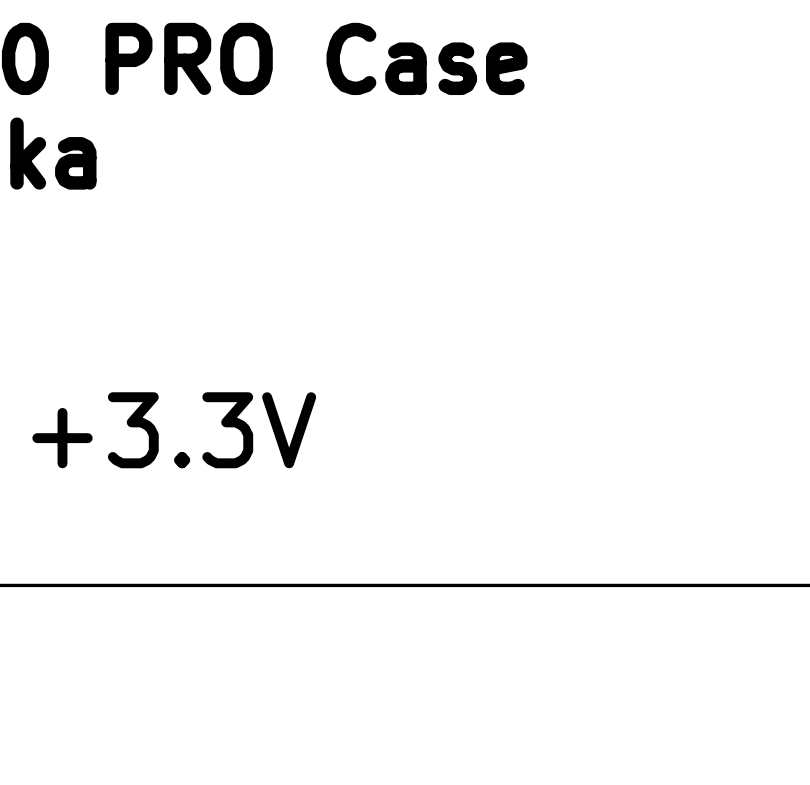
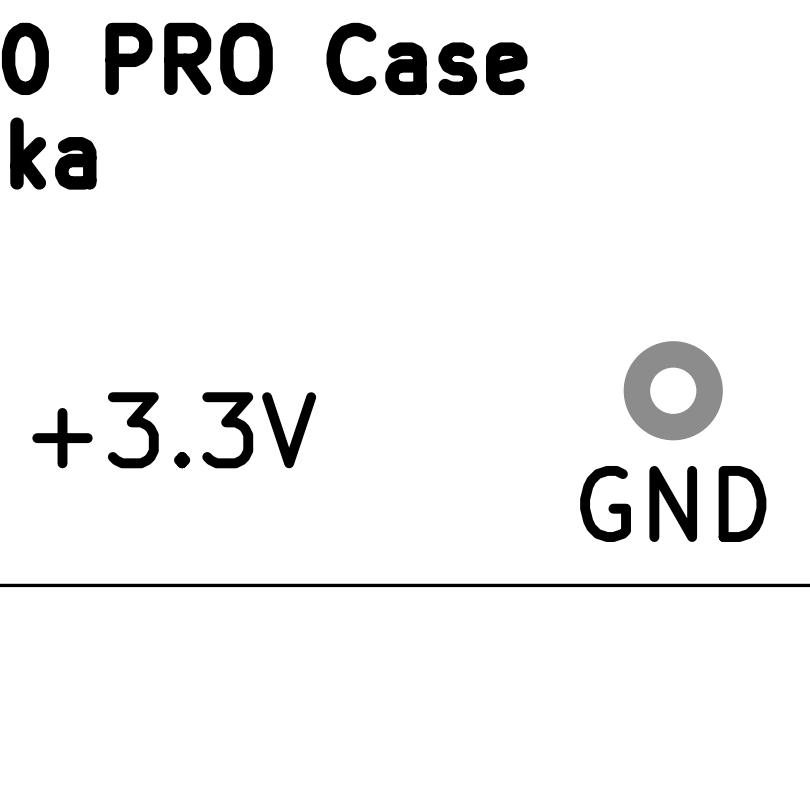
part: none -> GND (673, 390)

